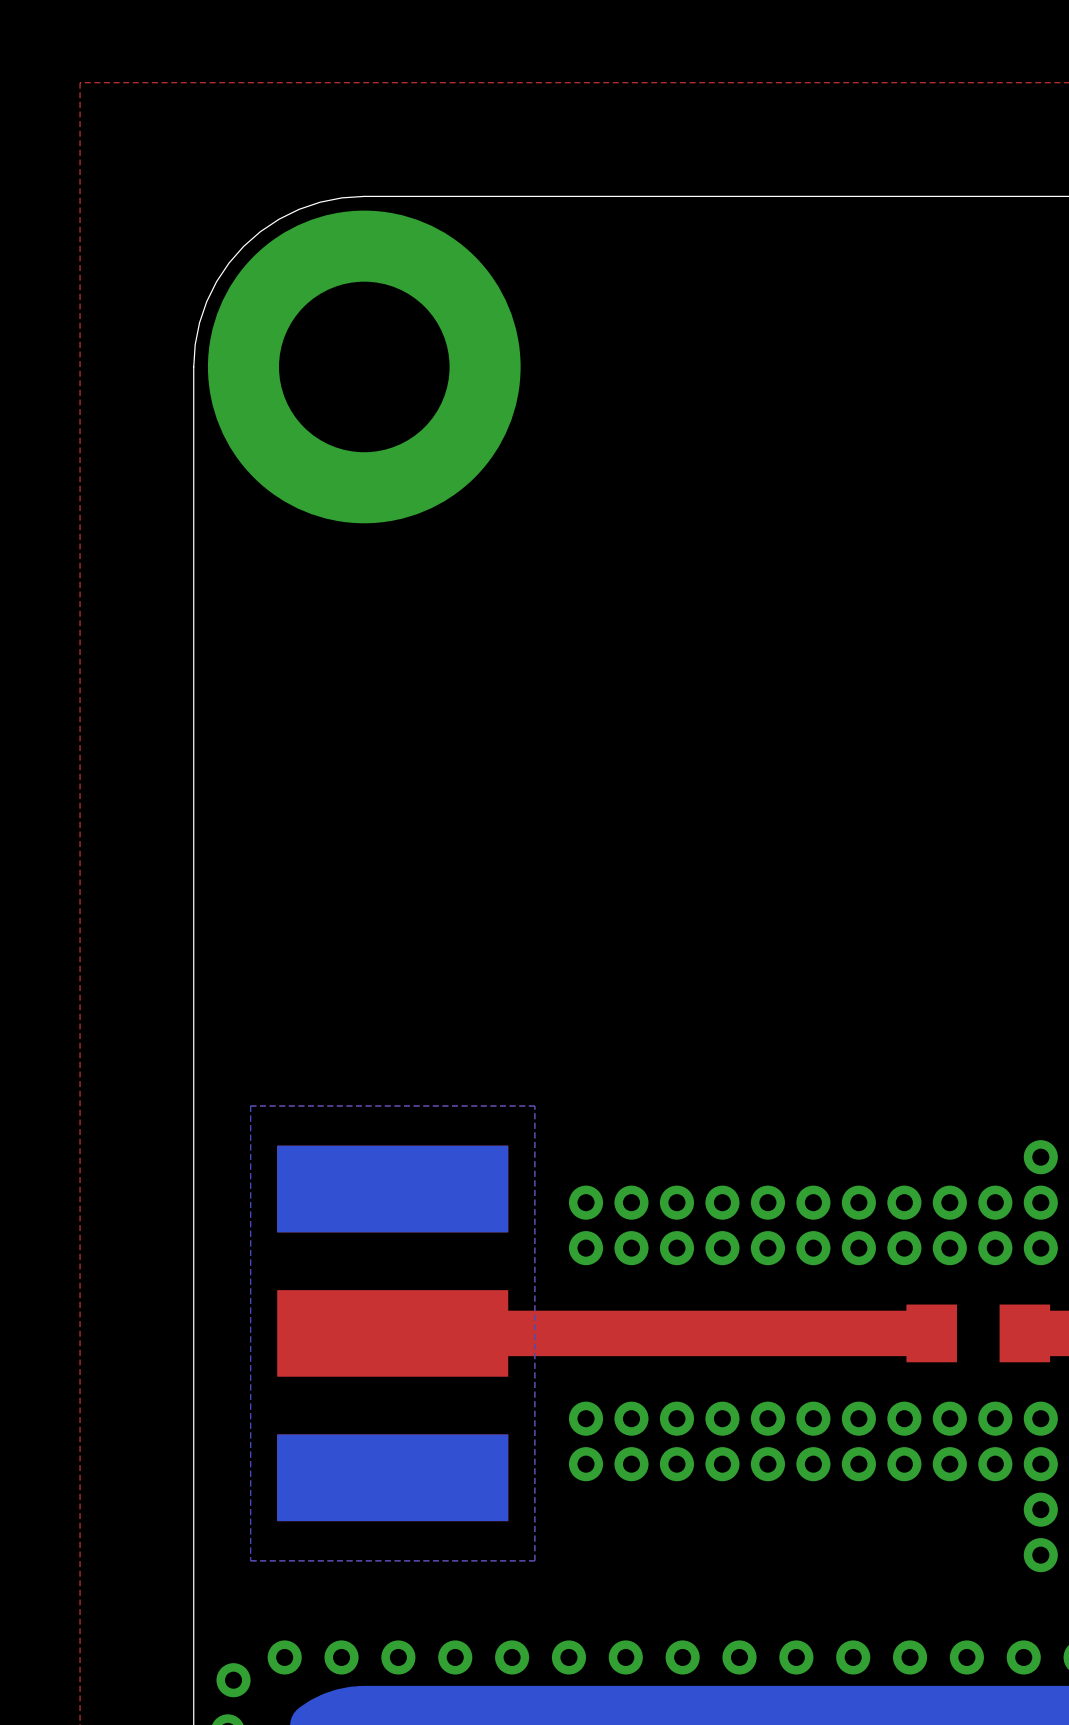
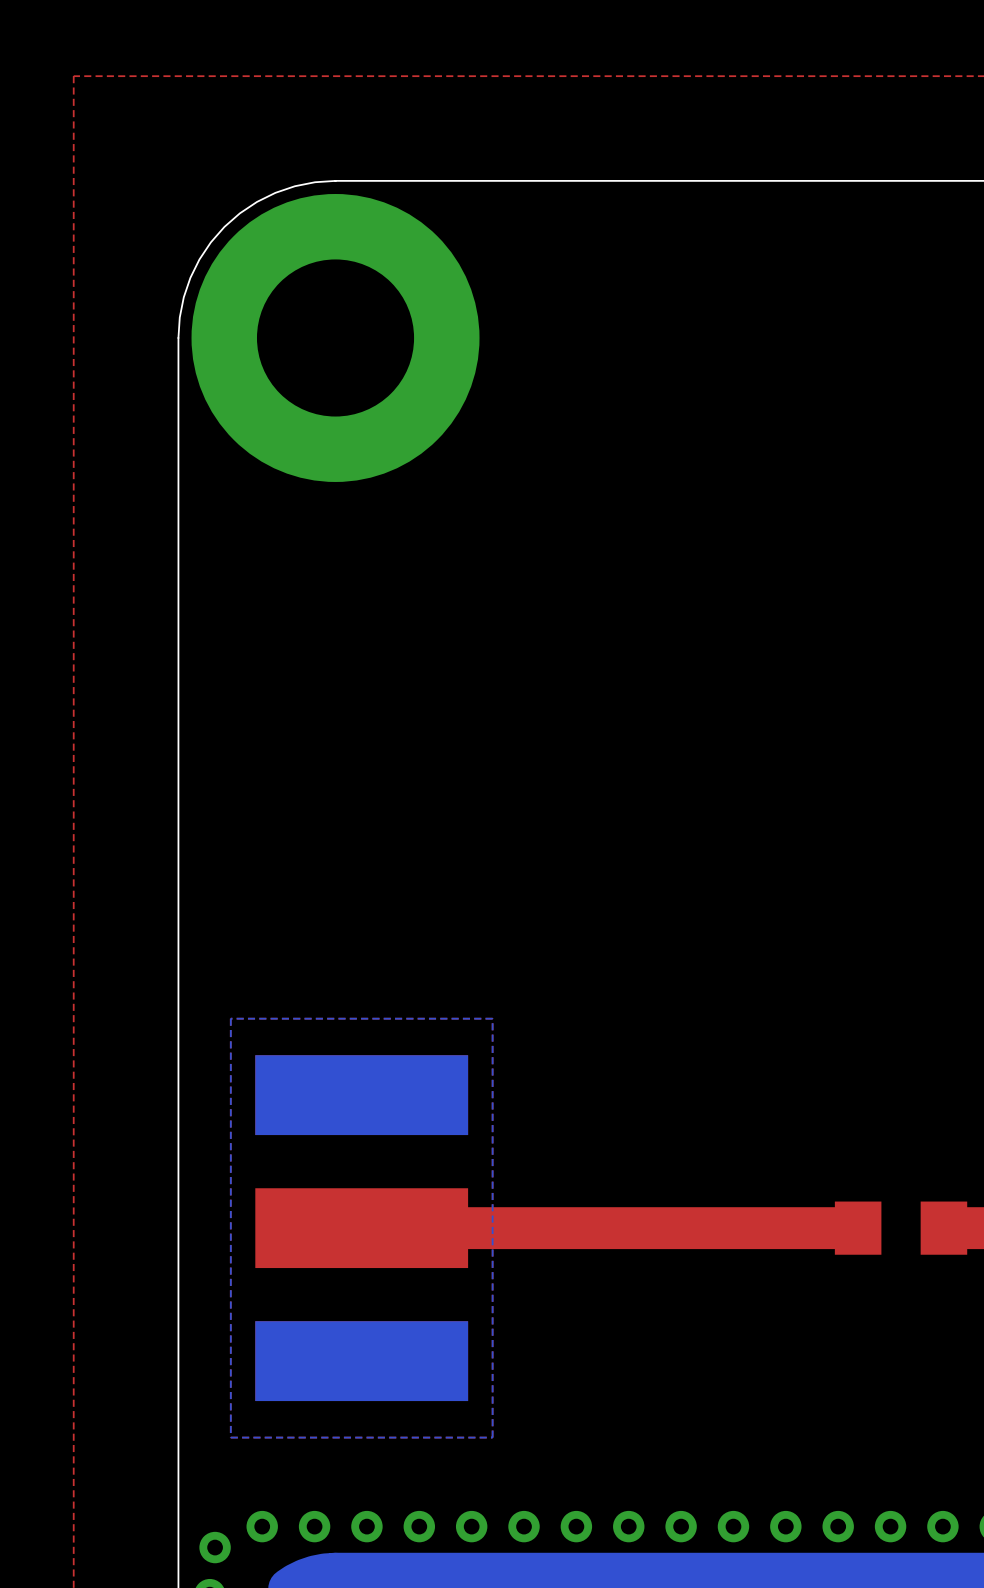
via: (1040, 1157) -> none
via: (586, 1202) -> none
via: (631, 1202) -> none
via: (676, 1202) -> none
via: (722, 1202) -> none
via: (767, 1202) -> none
via: (813, 1202) -> none
via: (858, 1202) -> none
via: (904, 1202) -> none
via: (949, 1202) -> none
via: (995, 1202) -> none
via: (1040, 1202) -> none
via: (586, 1248) -> none
via: (631, 1248) -> none
via: (676, 1248) -> none
via: (722, 1248) -> none
via: (767, 1248) -> none
via: (813, 1248) -> none
via: (858, 1248) -> none
via: (904, 1248) -> none
via: (949, 1248) -> none
via: (995, 1248) -> none
via: (1040, 1248) -> none
via: (586, 1418) -> none
via: (631, 1418) -> none
via: (676, 1418) -> none
via: (722, 1418) -> none
via: (767, 1418) -> none
via: (813, 1418) -> none
via: (858, 1418) -> none
via: (904, 1418) -> none
via: (949, 1418) -> none
via: (995, 1418) -> none
via: (1040, 1418) -> none
via: (586, 1464) -> none
via: (631, 1464) -> none
via: (676, 1464) -> none
via: (722, 1464) -> none
via: (767, 1464) -> none
via: (813, 1464) -> none
via: (858, 1464) -> none
via: (904, 1464) -> none
via: (949, 1464) -> none
via: (995, 1464) -> none
via: (1040, 1464) -> none
via: (1040, 1509) -> none
via: (1040, 1555) -> none

